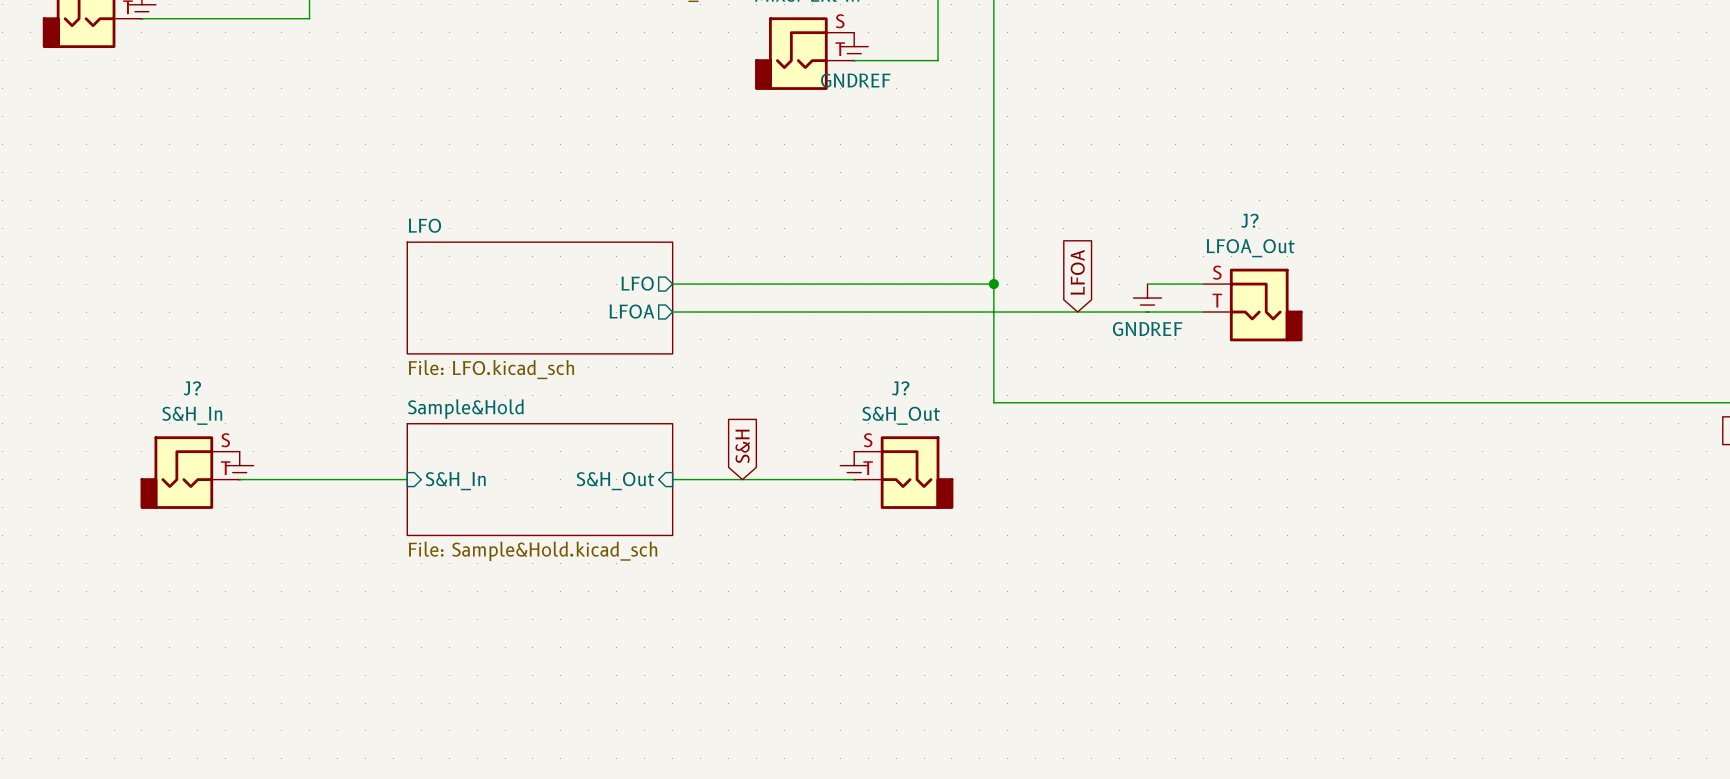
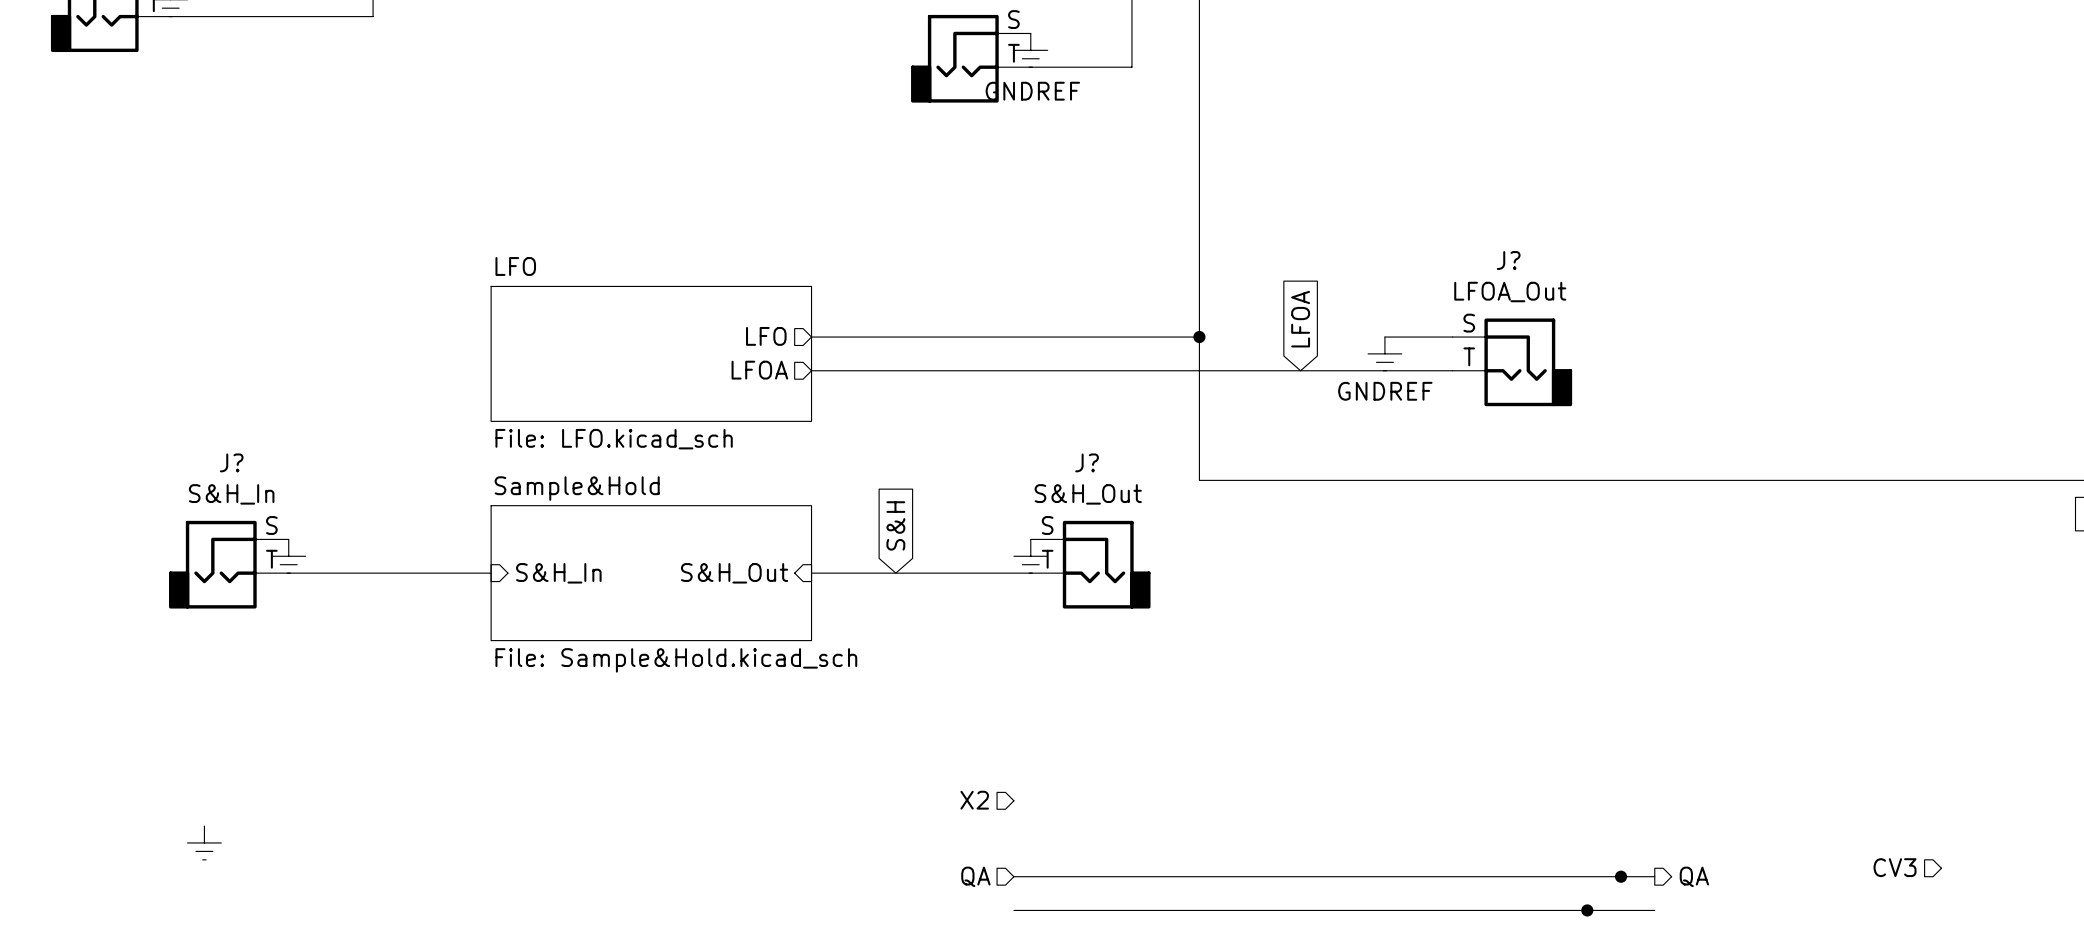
sheet pin: none -> X2 (974, 800)
power symbol: none -> (204, 842)
sheet pin: none -> CV3 (1895, 867)
wire: none -> (1013, 876) (1654, 876)
junction: none -> (1621, 876)
sheet pin: none -> QA (975, 876)
sheet pin: none -> QA (1694, 876)
wire: none -> (1013, 910) (1654, 910)
junction: none -> (1587, 910)

